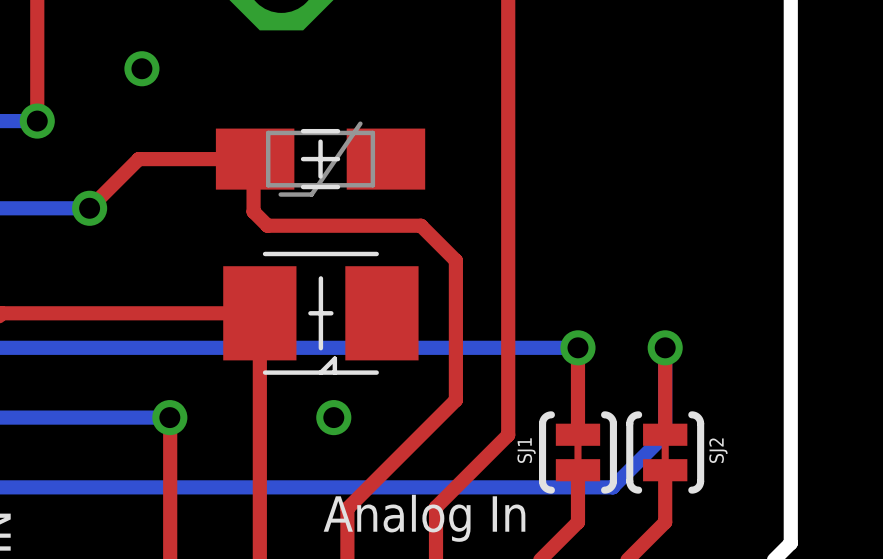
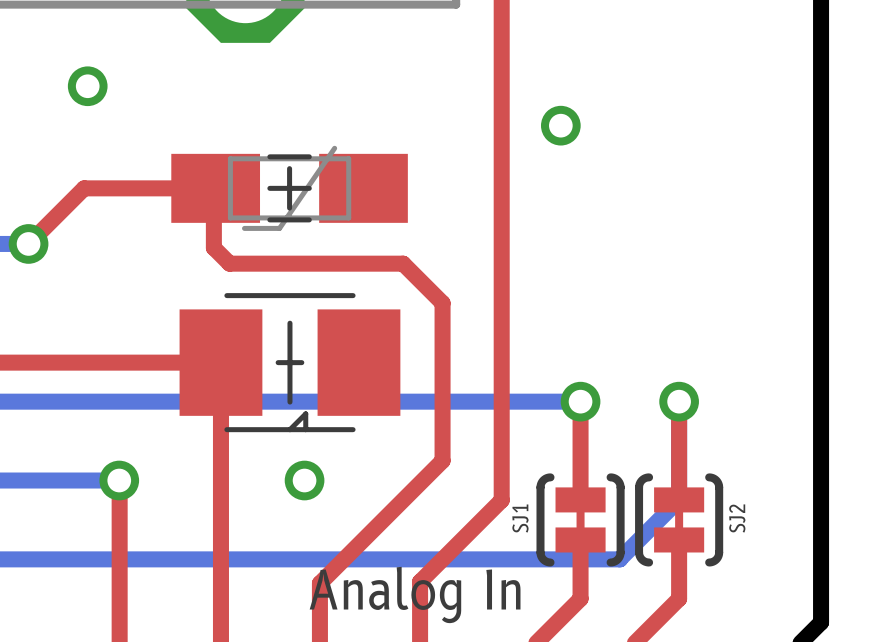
via: none -> (560, 125)

